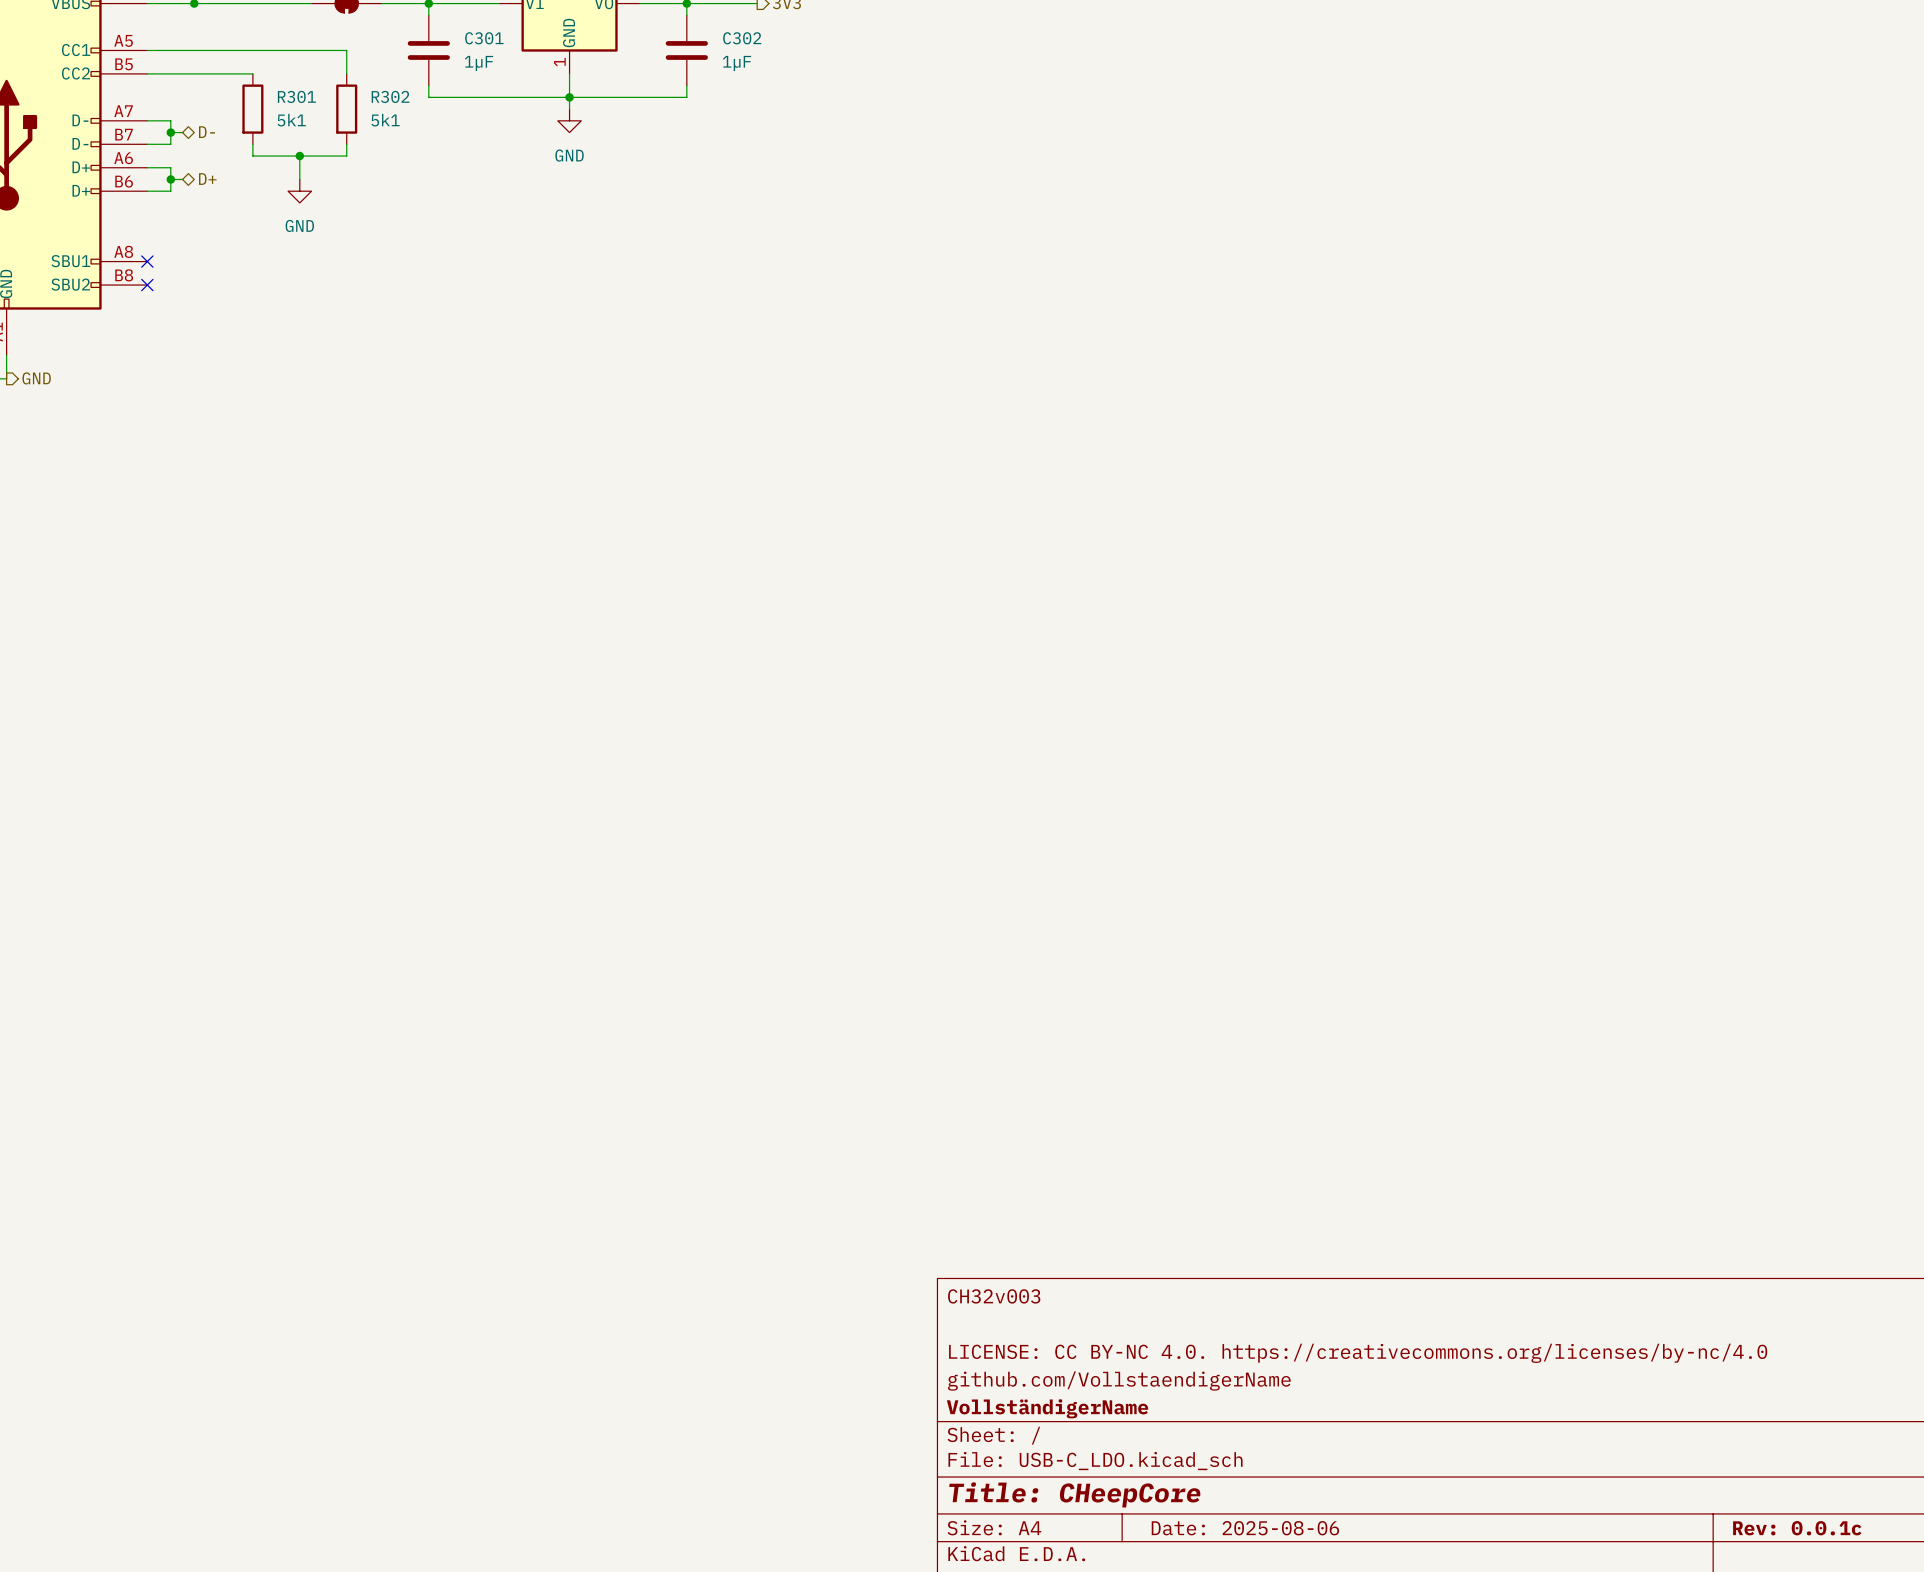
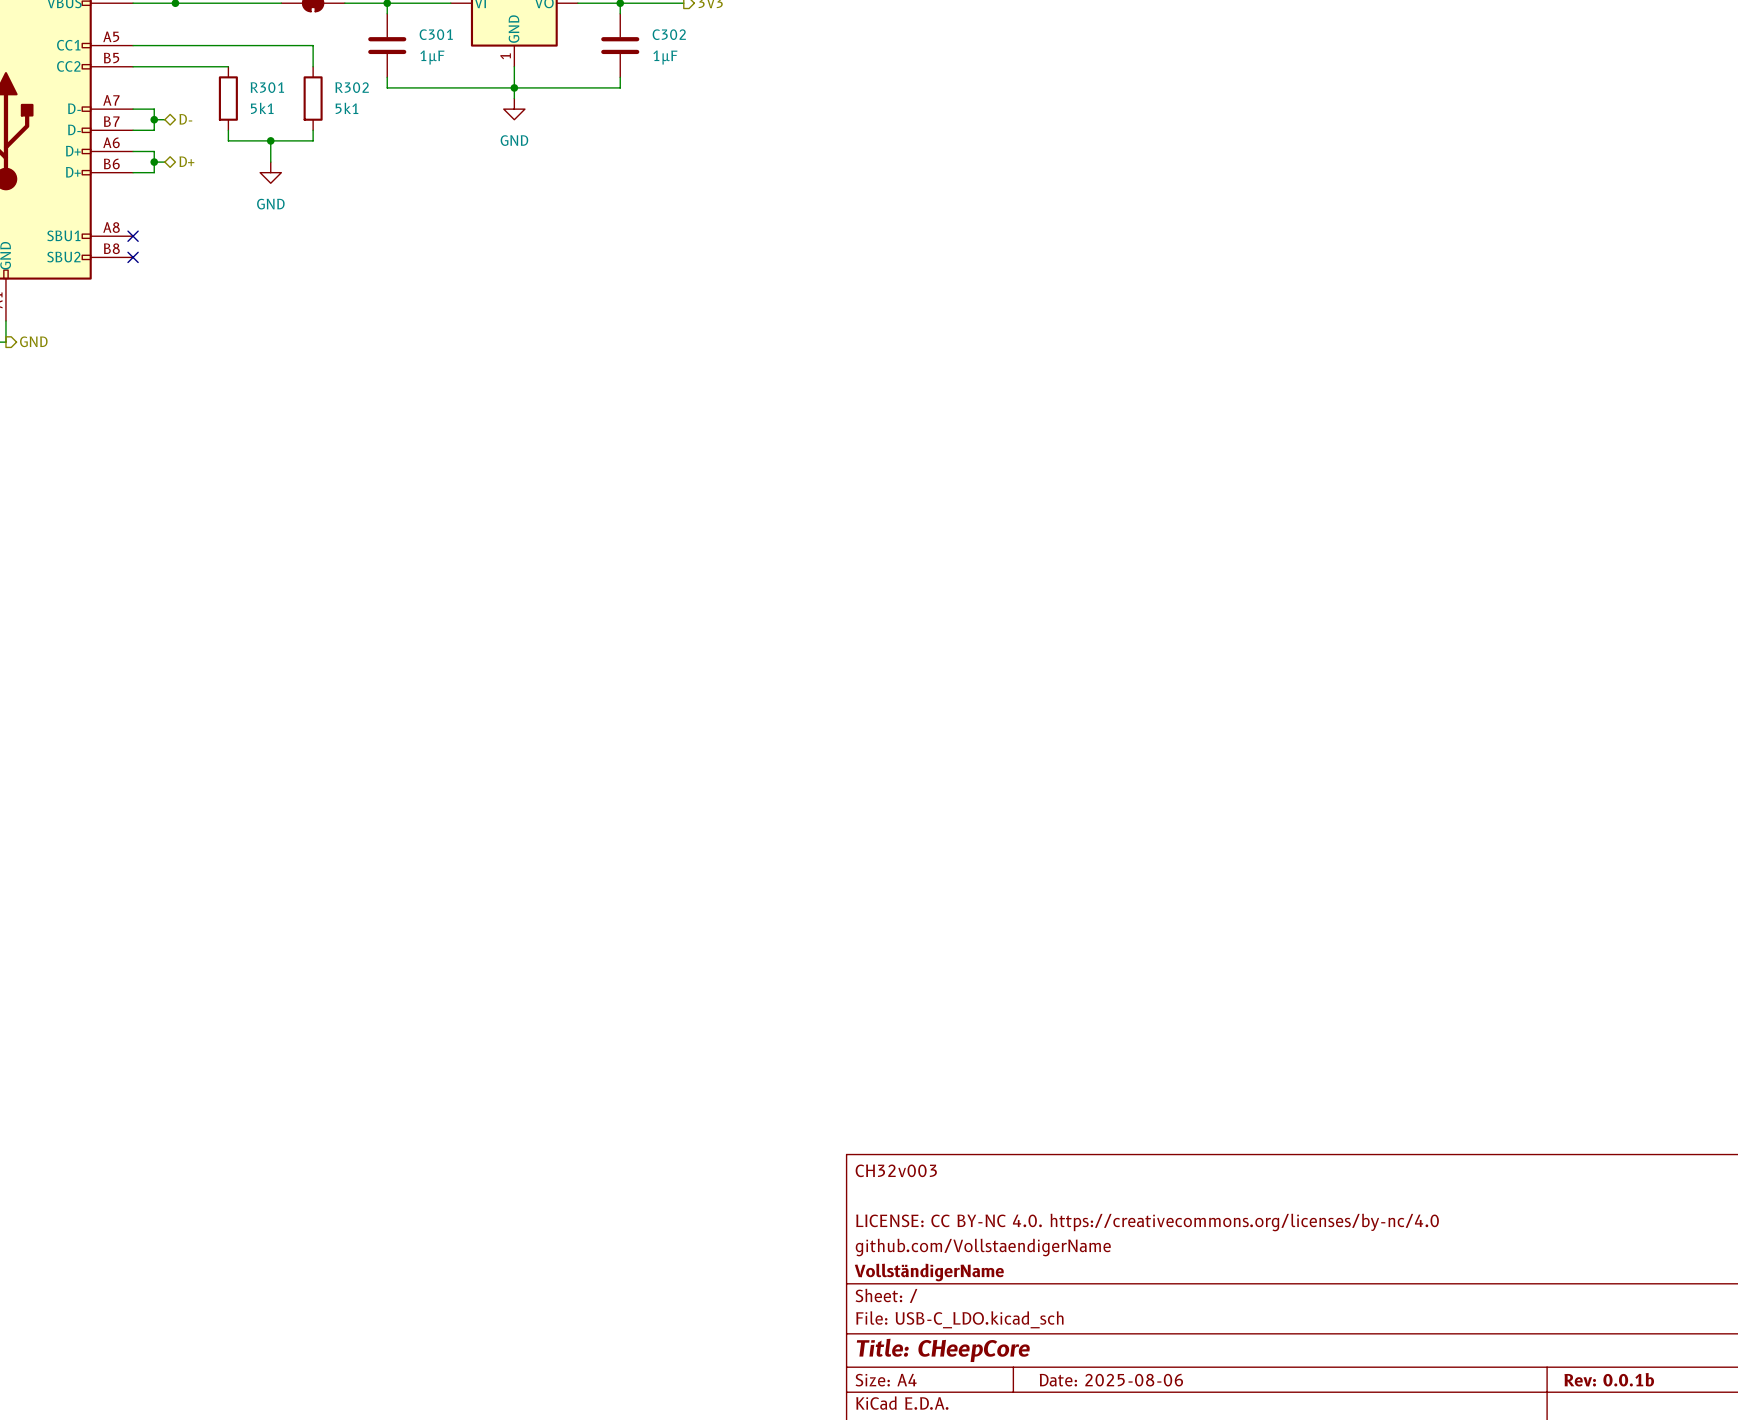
title block: Rev: 0.0.1c (1797, 1528) -> Rev: 0.0.1b (1609, 1379)

